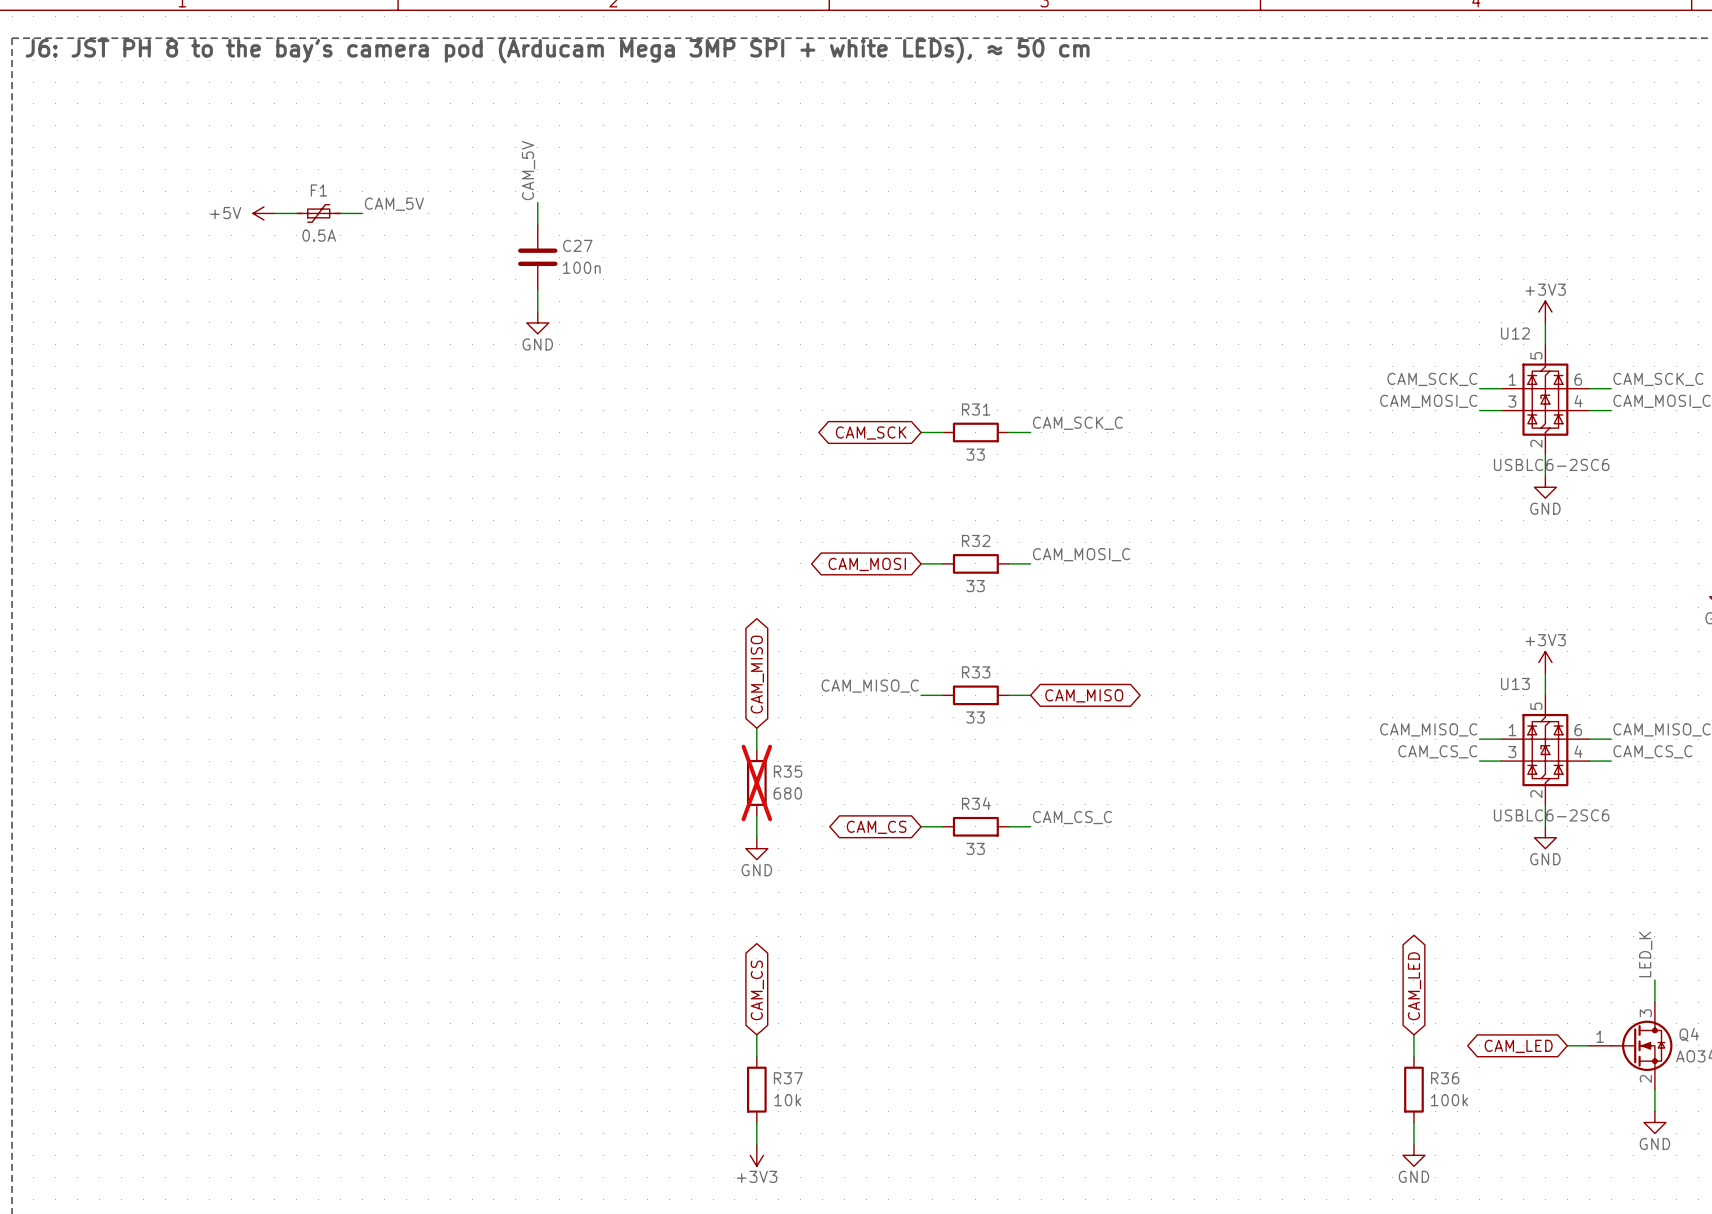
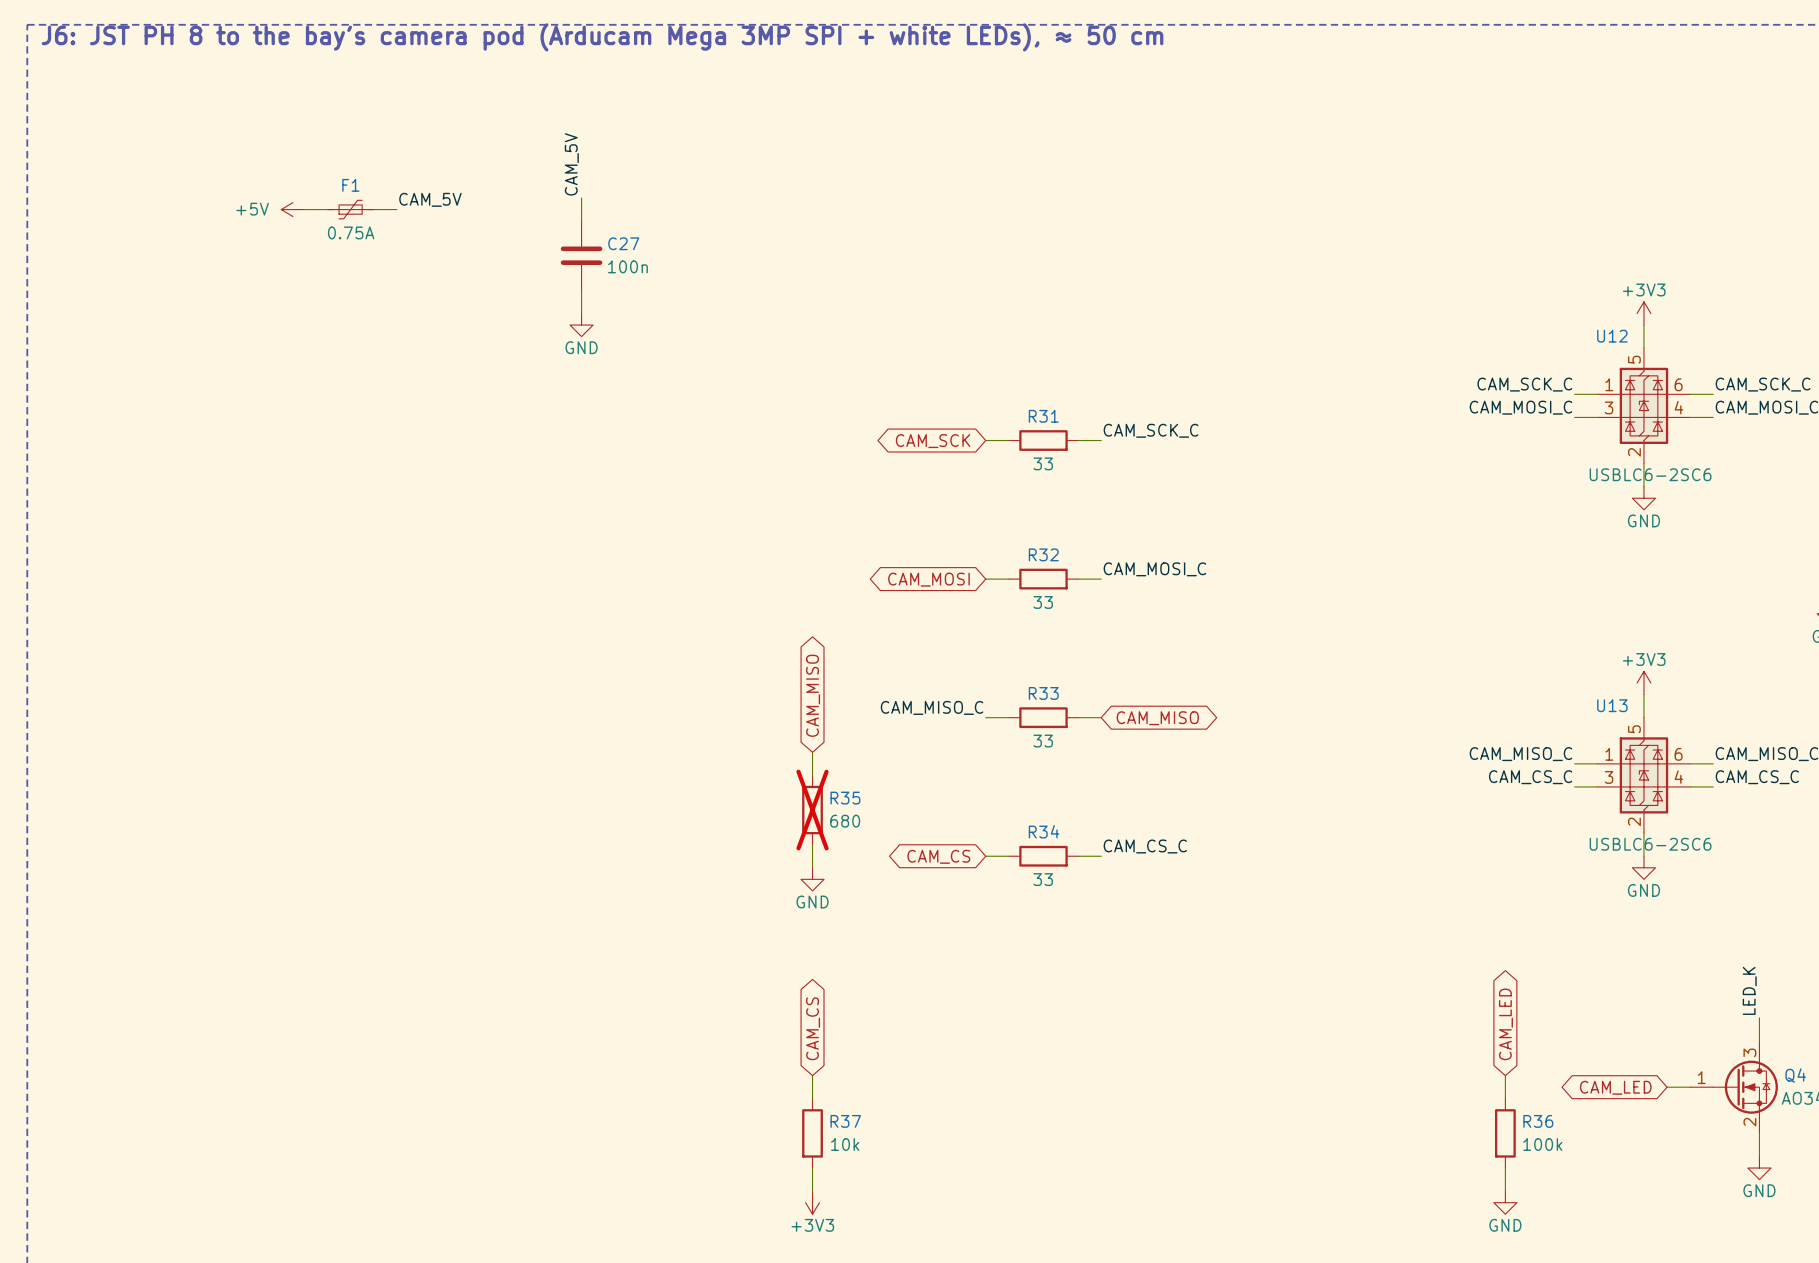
F1 value: 0.5A (319, 235) -> 0.75A (351, 232)

